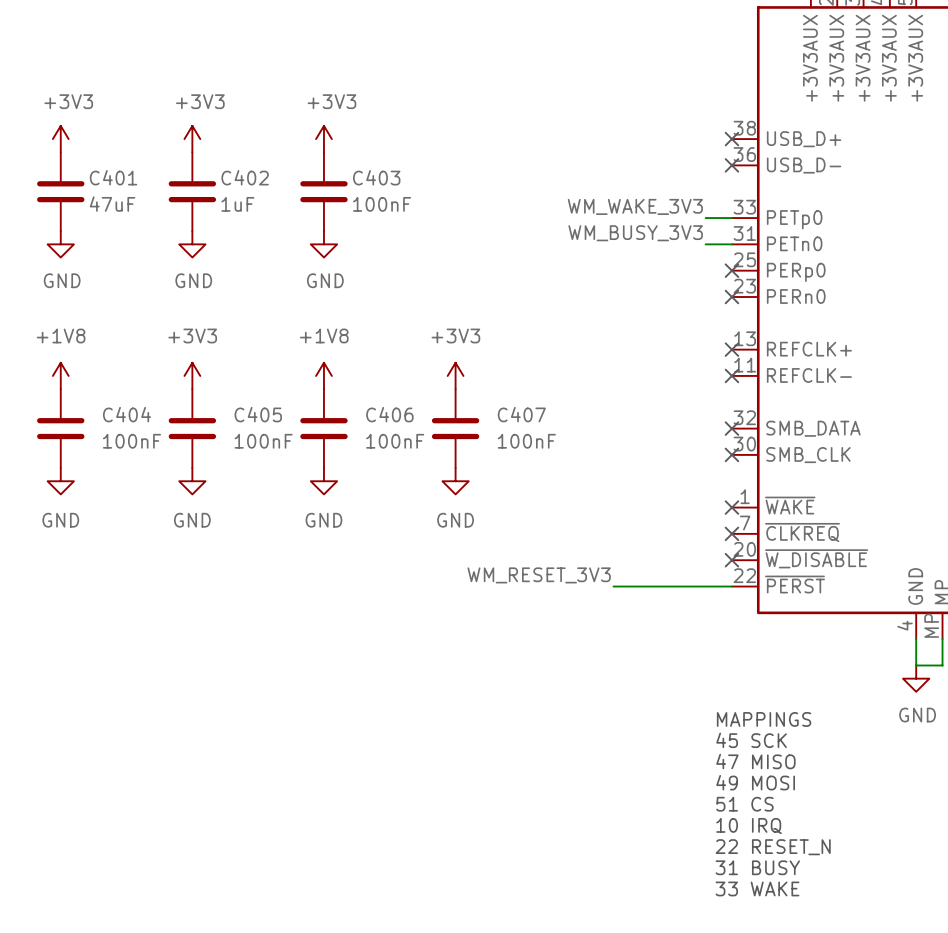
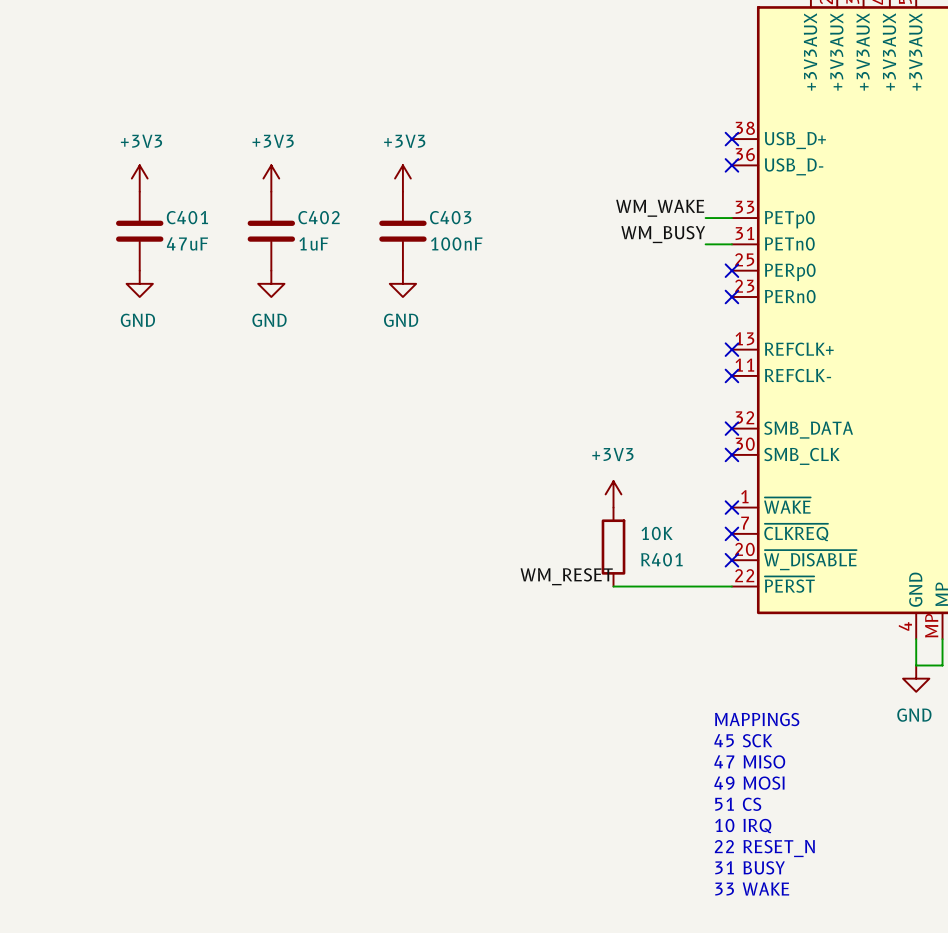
power symbol: +3V3 (60, 139) -> none
power symbol: +3V3 (192, 139) -> none
power symbol: +3V3 (323, 139) -> none
power symbol: none -> +3V3 (139, 178)
power symbol: none -> +3V3 (271, 178)
power symbol: none -> +3V3 (402, 178)
C401 position: (60, 191) -> (139, 231)
C402 position: (192, 191) -> (271, 231)
C403 position: (323, 191) -> (402, 231)
label: WM_WAKE_3V3 (635, 206) -> WM_WAKE (660, 208)
label: WM_BUSY_3V3 (635, 233) -> WM_BUSY (663, 234)
power symbol: GND (60, 244) -> none
power symbol: GND (192, 244) -> none
power symbol: GND (323, 244) -> none
power symbol: none -> GND (139, 283)
power symbol: none -> GND (271, 283)
power symbol: none -> GND (402, 283)
power symbol: +1V8 (60, 375) -> none
power symbol: +3V3 (192, 375) -> none
power symbol: +1V8 (323, 375) -> none
power symbol: +3V3 (455, 375) -> none
C404: 100nF (60, 428) -> none
C405: 100nF (192, 428) -> none
C406: 100nF (323, 428) -> none
C407: 100nF (455, 428) -> none
power symbol: GND (60, 481) -> none
power symbol: GND (192, 481) -> none
power symbol: GND (323, 481) -> none
power symbol: GND (455, 481) -> none
power symbol: none -> +3V3 (613, 494)
R401: none -> 10K (613, 547)
label: WM_RESET_3V3 (539, 575) -> WM_RESET (566, 576)

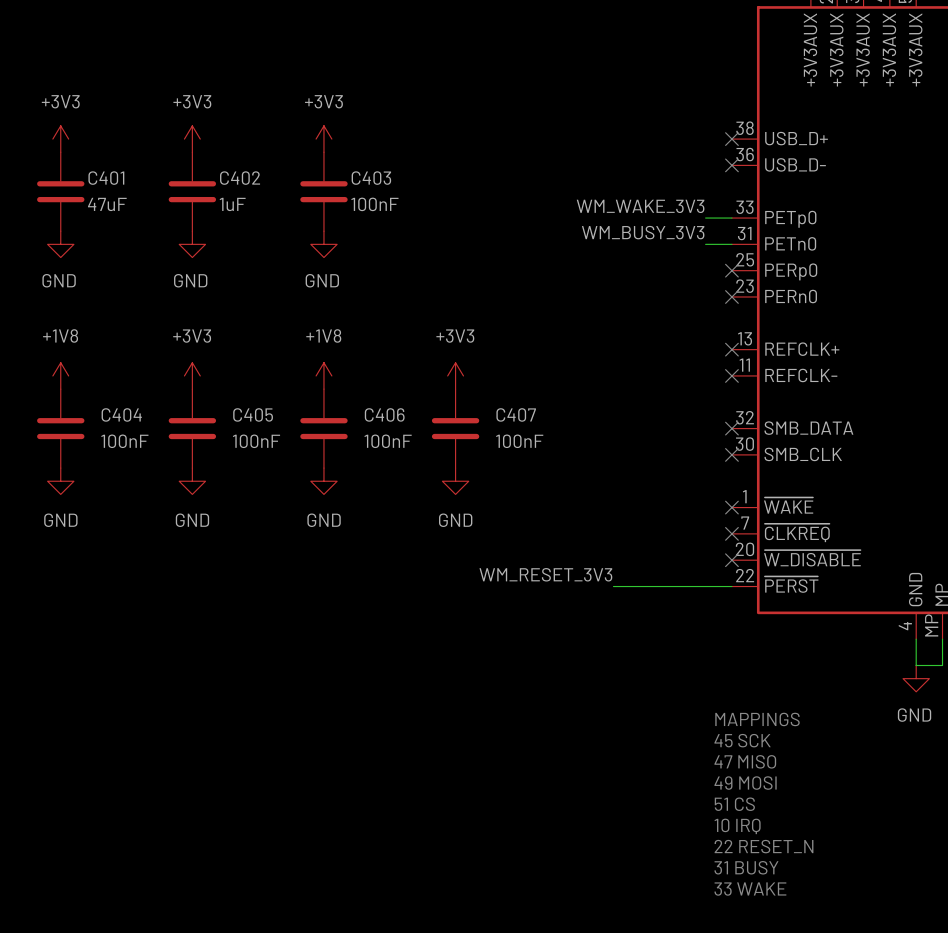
power symbol: none -> +3V3 (60, 139)
power symbol: none -> +3V3 (192, 139)
power symbol: none -> +3V3 (323, 139)
power symbol: +3V3 (139, 178) -> none
power symbol: +3V3 (271, 178) -> none
power symbol: +3V3 (402, 178) -> none
label: WM_WAKE (660, 208) -> WM_WAKE_3V3 (640, 206)
C401 position: (139, 231) -> (60, 191)
C402 position: (271, 231) -> (192, 191)
C403 position: (402, 231) -> (323, 191)
label: WM_BUSY (663, 234) -> WM_BUSY_3V3 (643, 232)
power symbol: none -> GND (60, 244)
power symbol: none -> GND (192, 244)
power symbol: none -> GND (323, 244)
power symbol: GND (139, 283) -> none
power symbol: GND (271, 283) -> none
power symbol: GND (402, 283) -> none
power symbol: none -> +1V8 (60, 375)
power symbol: none -> +3V3 (192, 375)
power symbol: none -> +1V8 (323, 375)
power symbol: none -> +3V3 (455, 375)
C404: none -> 100nF (60, 428)
C405: none -> 100nF (192, 428)
C406: none -> 100nF (323, 428)
C407: none -> 100nF (455, 428)
power symbol: none -> GND (60, 481)
power symbol: none -> GND (192, 481)
power symbol: none -> GND (323, 481)
power symbol: none -> GND (455, 481)
power symbol: +3V3 (613, 494) -> none
R401: 10K (613, 547) -> none
label: WM_RESET (566, 576) -> WM_RESET_3V3 (545, 574)

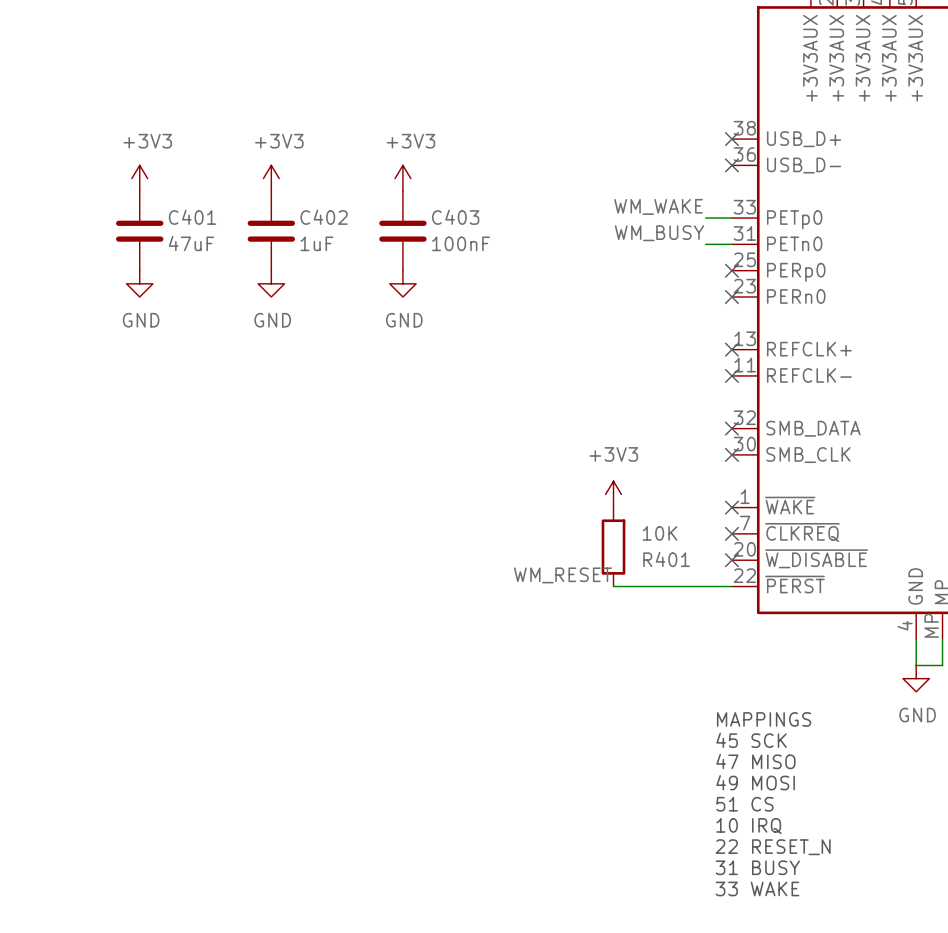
power symbol: +3V3 (60, 139) -> none
power symbol: +3V3 (192, 139) -> none
power symbol: +3V3 (323, 139) -> none
power symbol: none -> +3V3 (139, 178)
power symbol: none -> +3V3 (271, 178)
power symbol: none -> +3V3 (402, 178)
C401 position: (60, 191) -> (139, 231)
C402 position: (192, 191) -> (271, 231)
C403 position: (323, 191) -> (402, 231)
label: WM_WAKE_3V3 (640, 206) -> WM_WAKE (658, 206)
label: WM_BUSY_3V3 (643, 232) -> WM_BUSY (659, 233)
power symbol: GND (60, 244) -> none
power symbol: GND (192, 244) -> none
power symbol: GND (323, 244) -> none
power symbol: none -> GND (139, 283)
power symbol: none -> GND (271, 283)
power symbol: none -> GND (402, 283)
power symbol: +1V8 (60, 375) -> none
power symbol: +3V3 (192, 375) -> none
power symbol: +1V8 (323, 375) -> none
power symbol: +3V3 (455, 375) -> none
C404: 100nF (60, 428) -> none
C405: 100nF (192, 428) -> none
C406: 100nF (323, 428) -> none
C407: 100nF (455, 428) -> none
power symbol: GND (60, 481) -> none
power symbol: GND (192, 481) -> none
power symbol: GND (323, 481) -> none
power symbol: GND (455, 481) -> none
power symbol: none -> +3V3 (613, 494)
R401: none -> 10K (613, 547)
label: WM_RESET_3V3 (545, 574) -> WM_RESET (562, 575)

